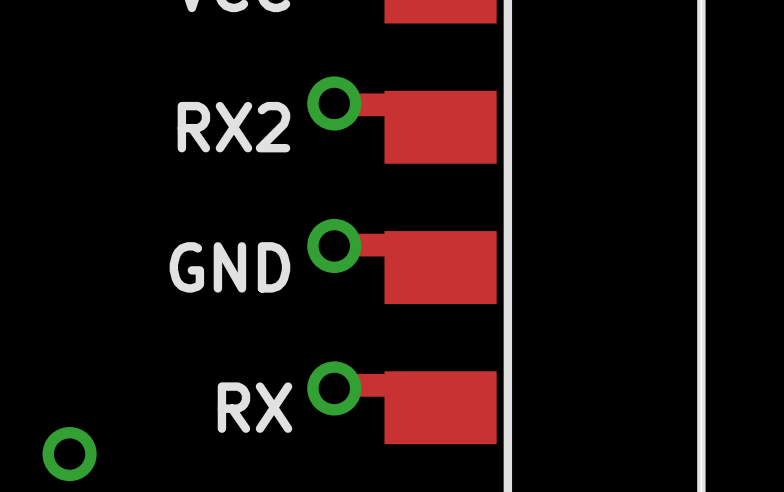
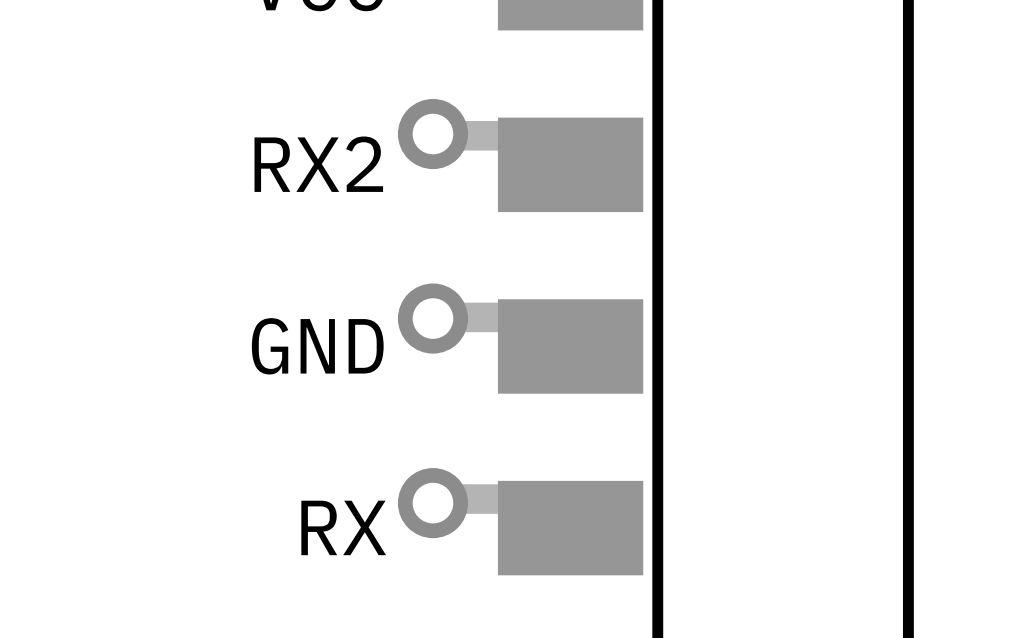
part: (69, 454) -> none

